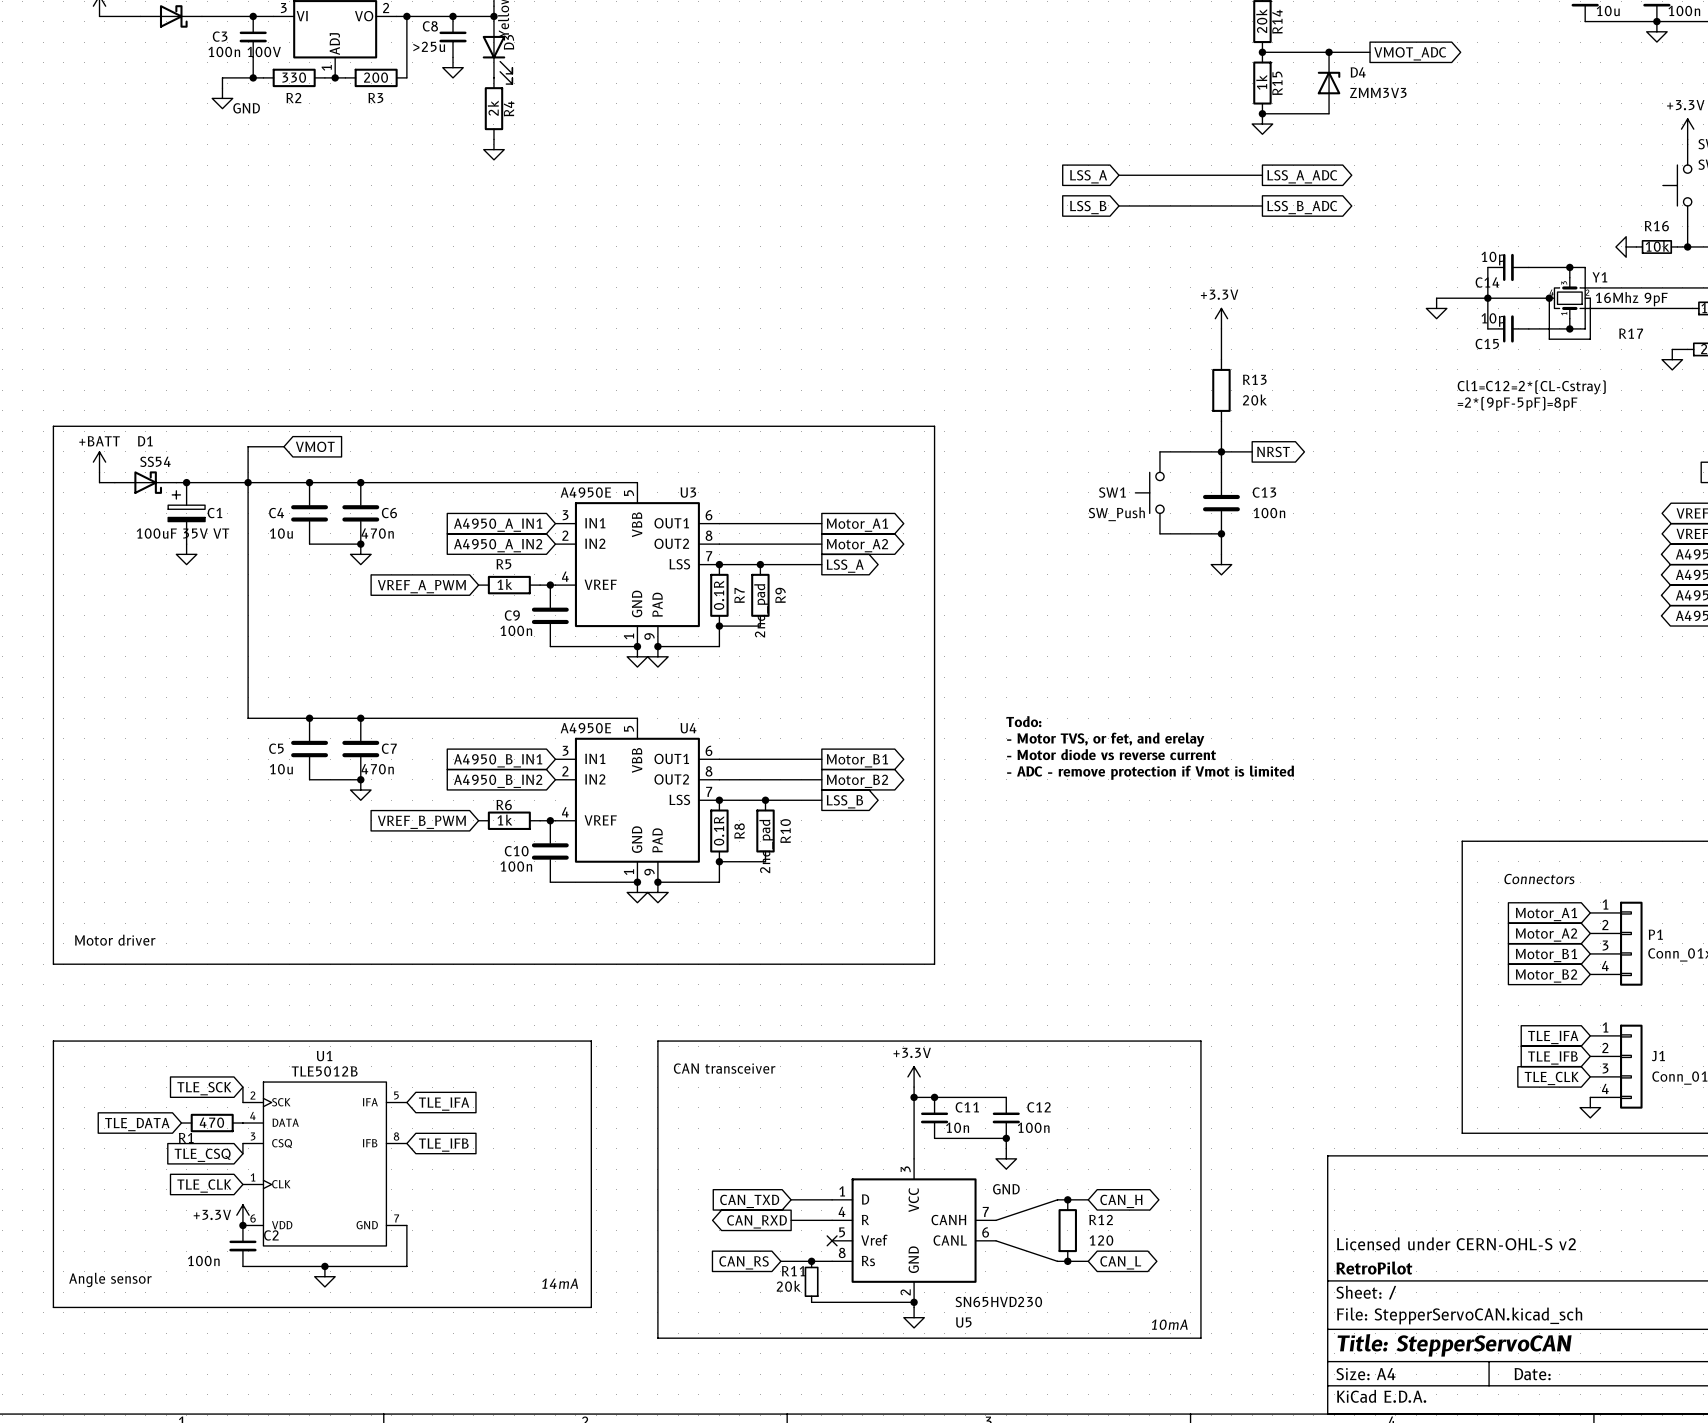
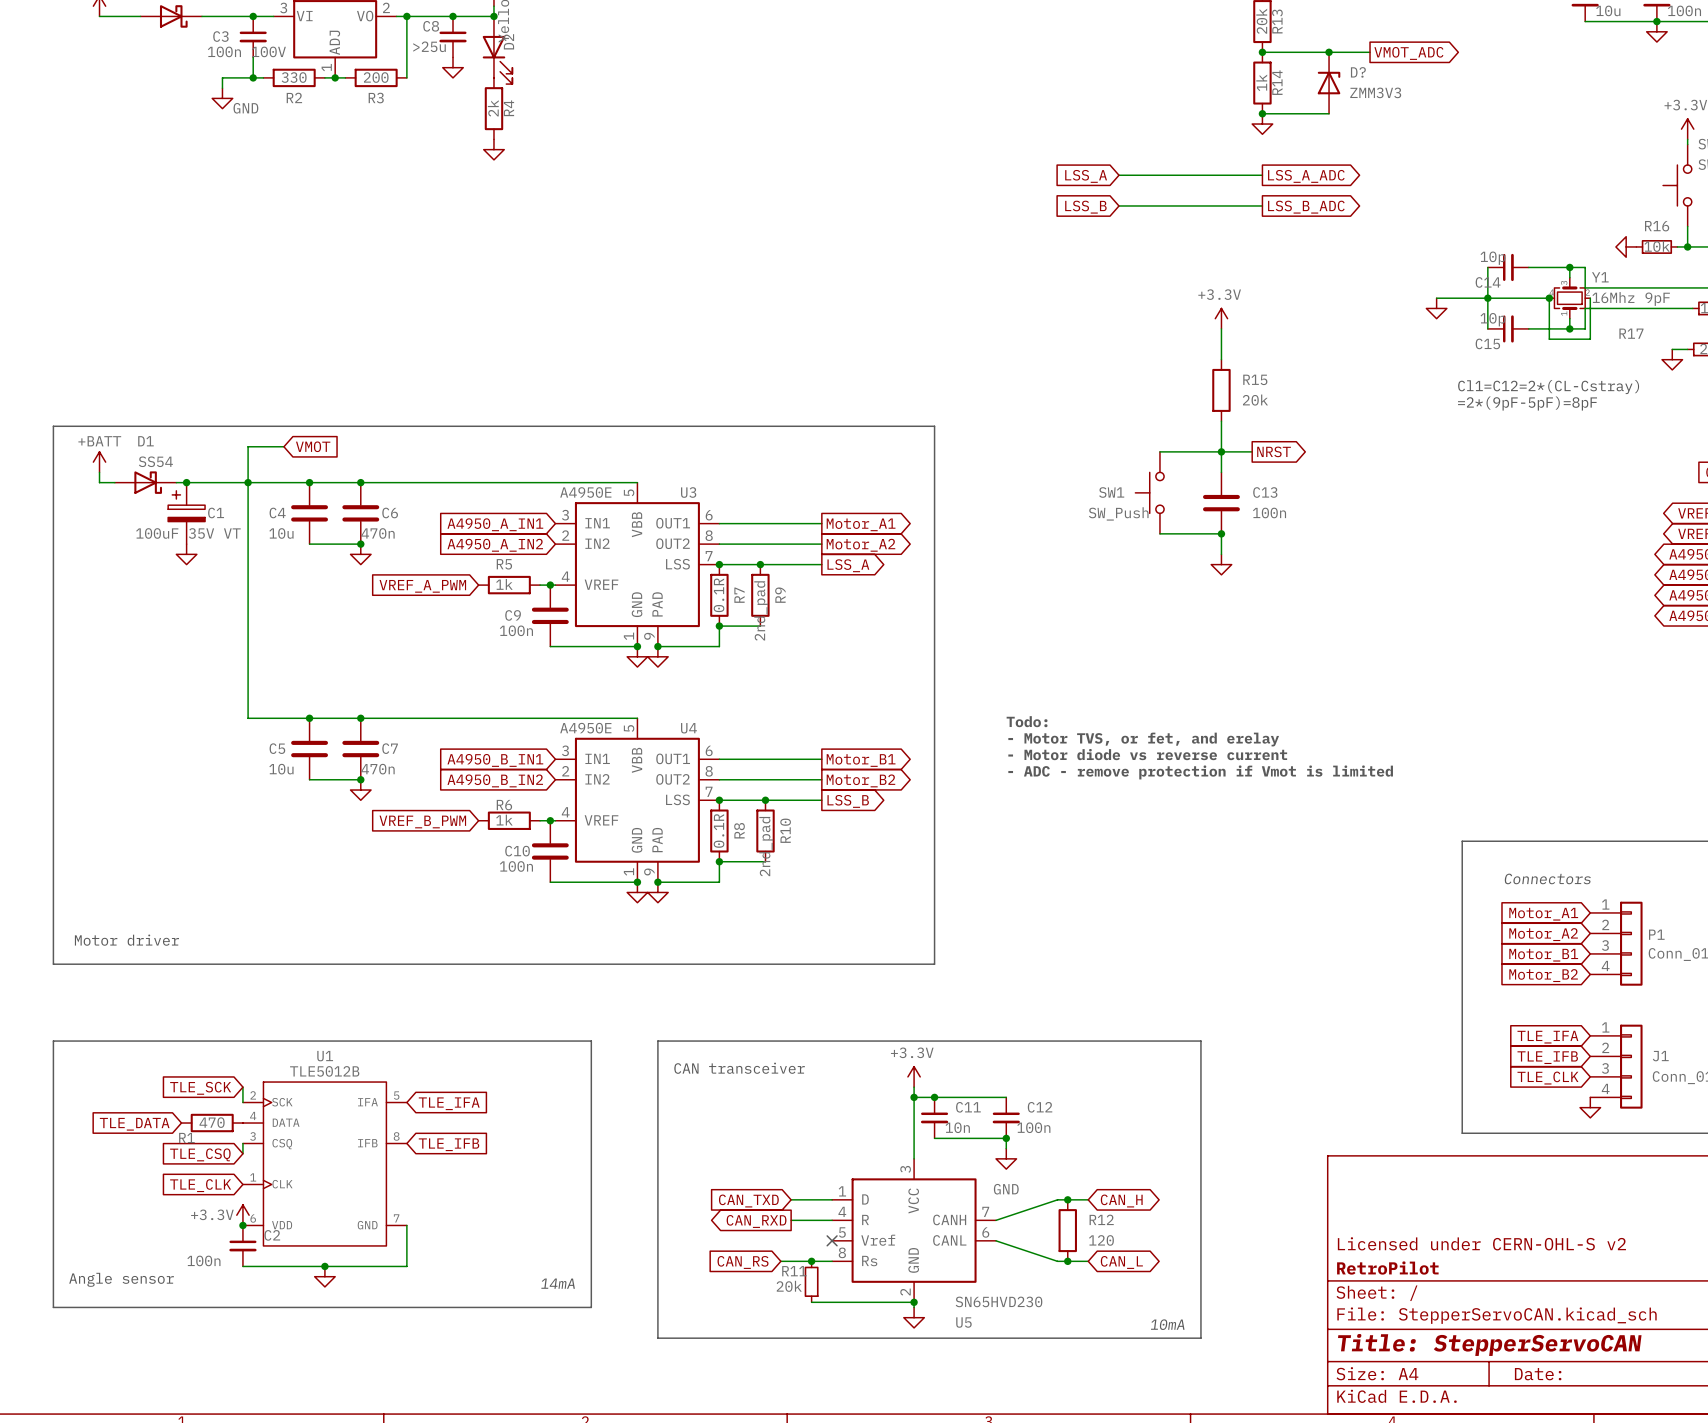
R14 name: R14 (1277, 21) -> R13 (1277, 21)
D3 name: D3 (509, 42) -> D2 (508, 41)
D4 name: D4 (1358, 72) -> D? (1358, 72)
R15 name: R15 (1277, 83) -> R14 (1277, 82)
R13 name: R13 (1254, 379) -> R15 (1255, 379)

